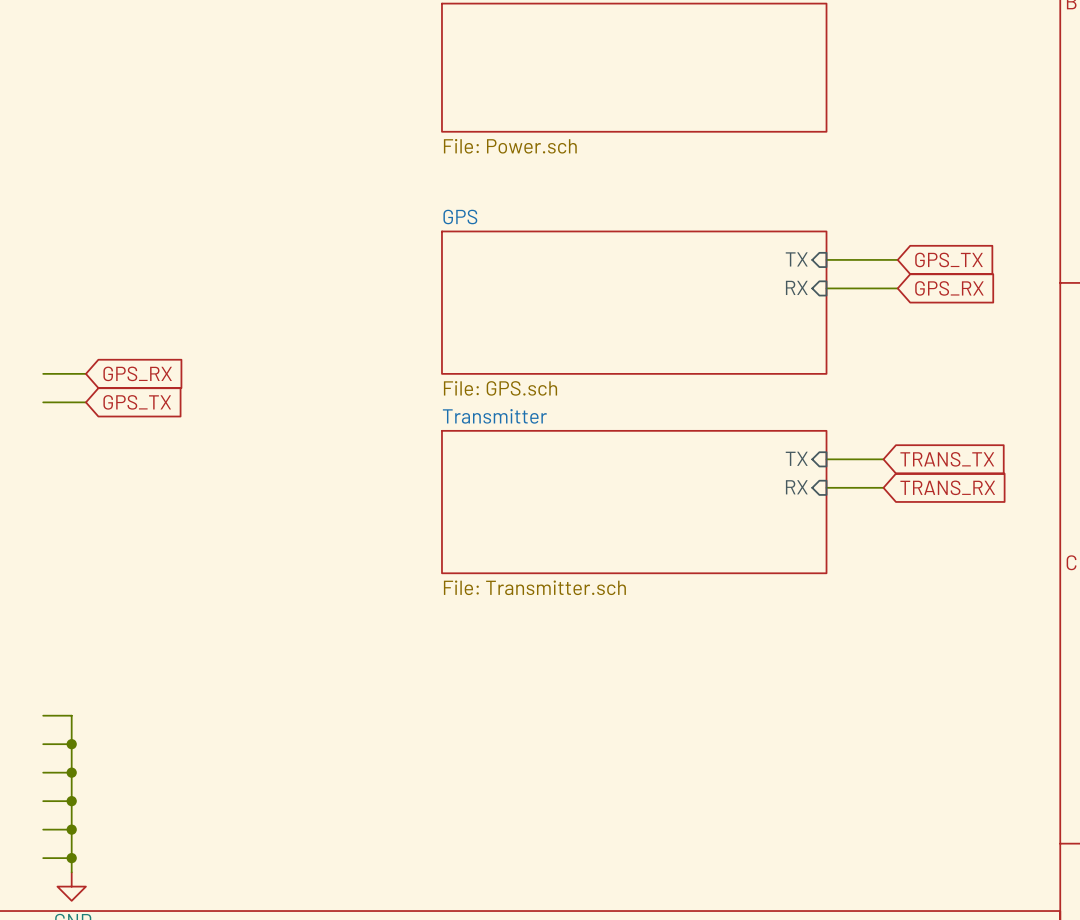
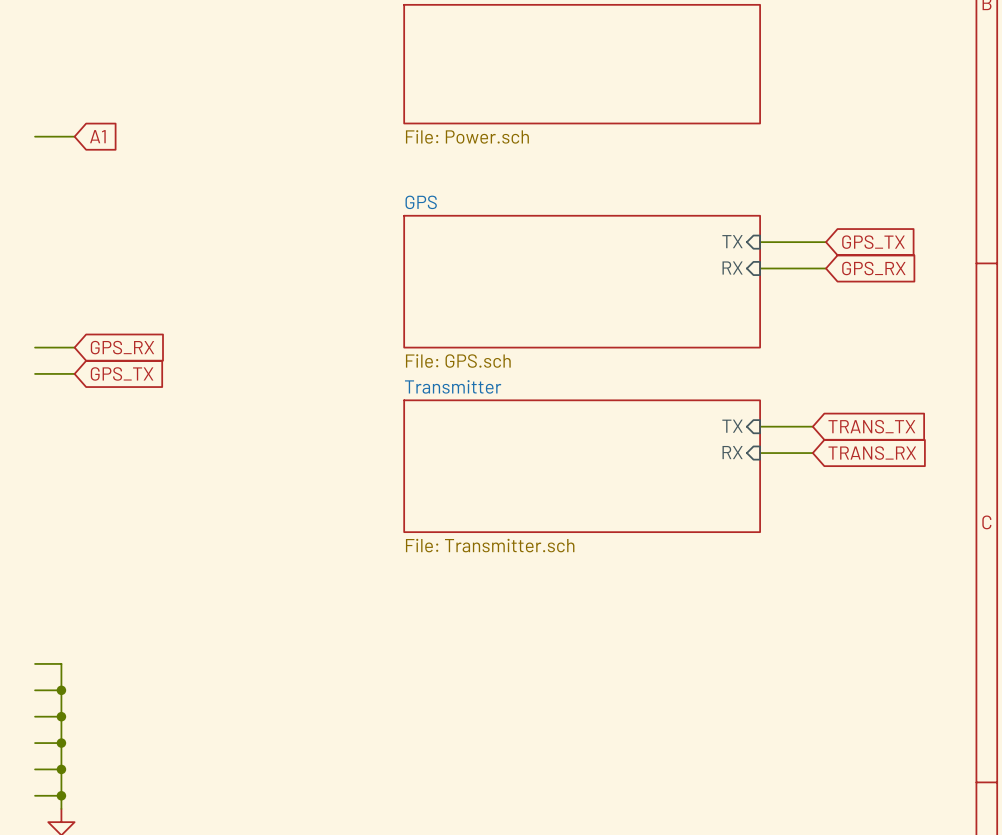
wire: none -> (35, 136) (74, 136)
global label: none -> A1 (97, 136)

